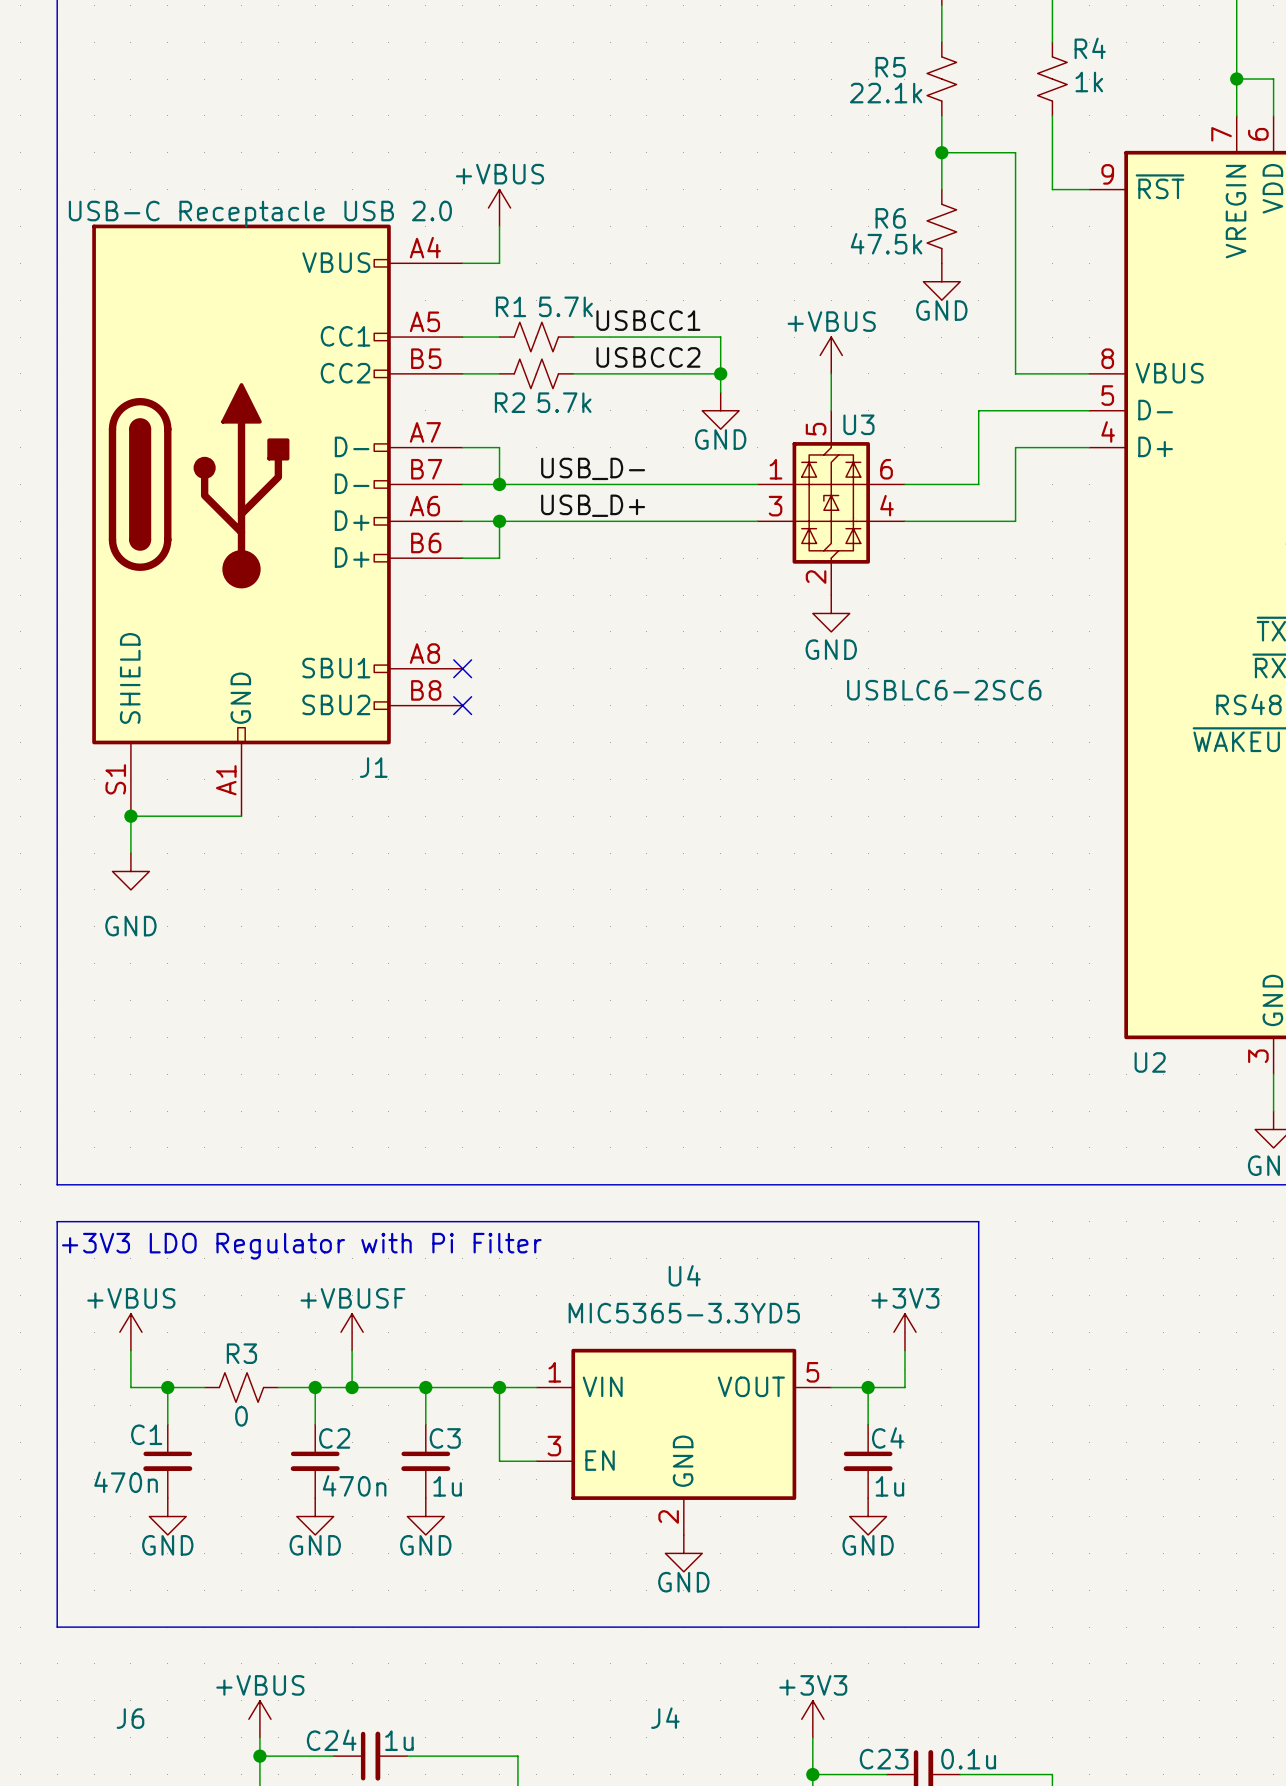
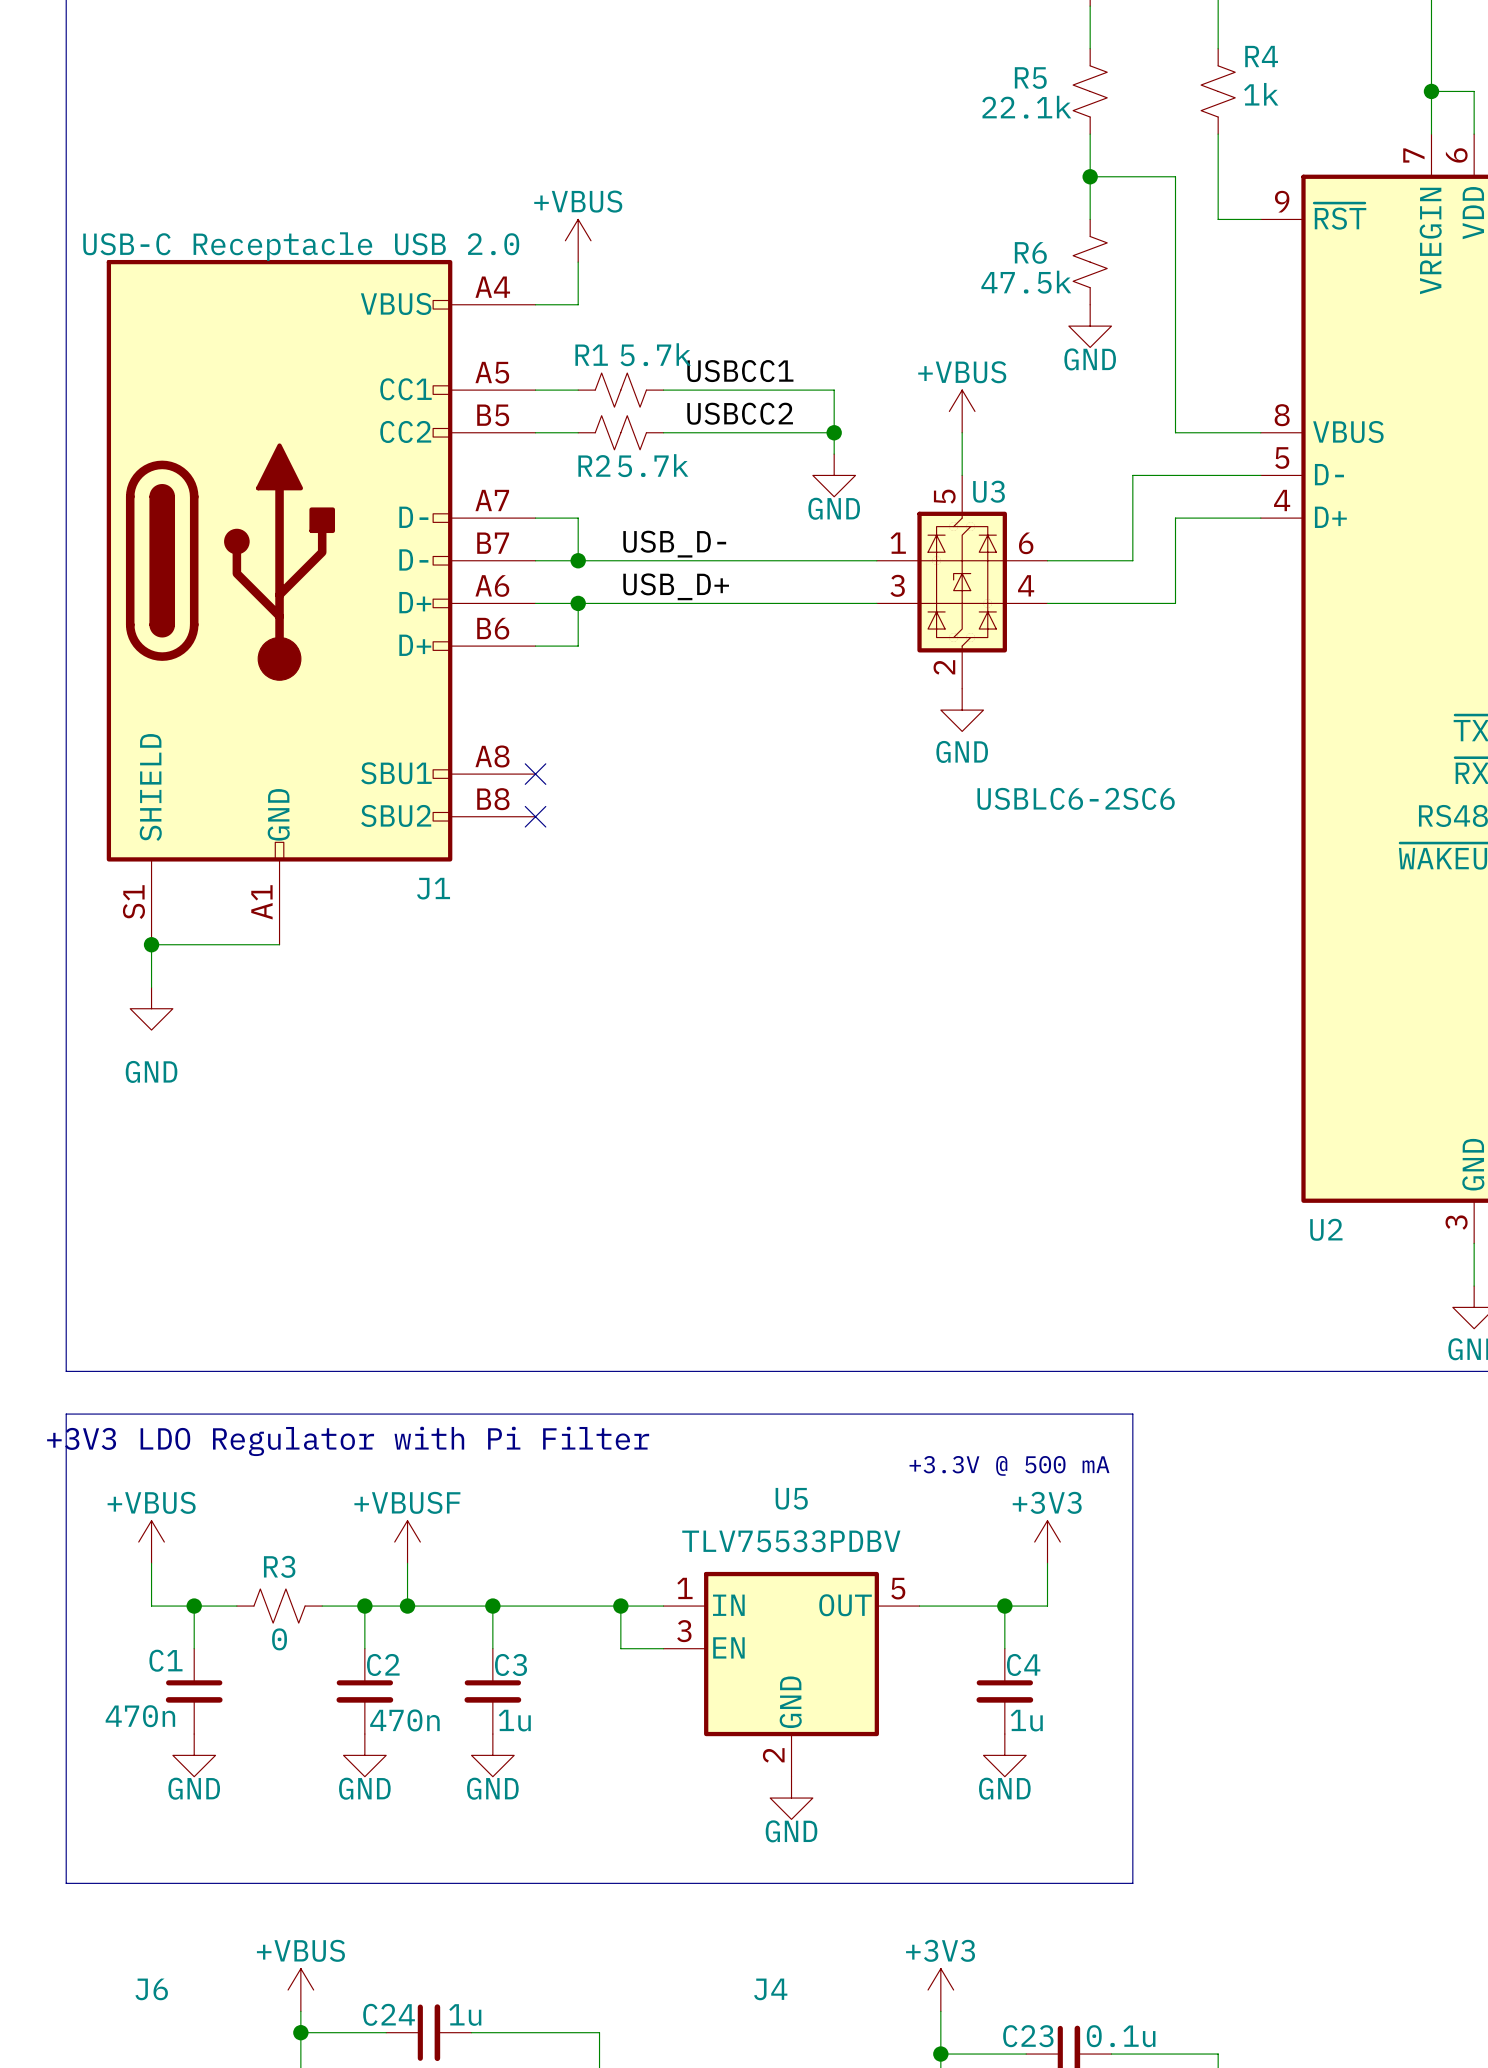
text: none -> +3.3V @ 500 mA (1009, 1465)
wire: (499, 1387) (499, 1461) (536, 1461) -> none
junction position: (499, 1387) -> (620, 1606)
wire: none -> (663, 1606) (620, 1606) (620, 1648) (663, 1648)
U4: MIC5365-3.3YD5 (683, 1441) -> none
U5: none -> TLV75533PDBV (791, 1674)

